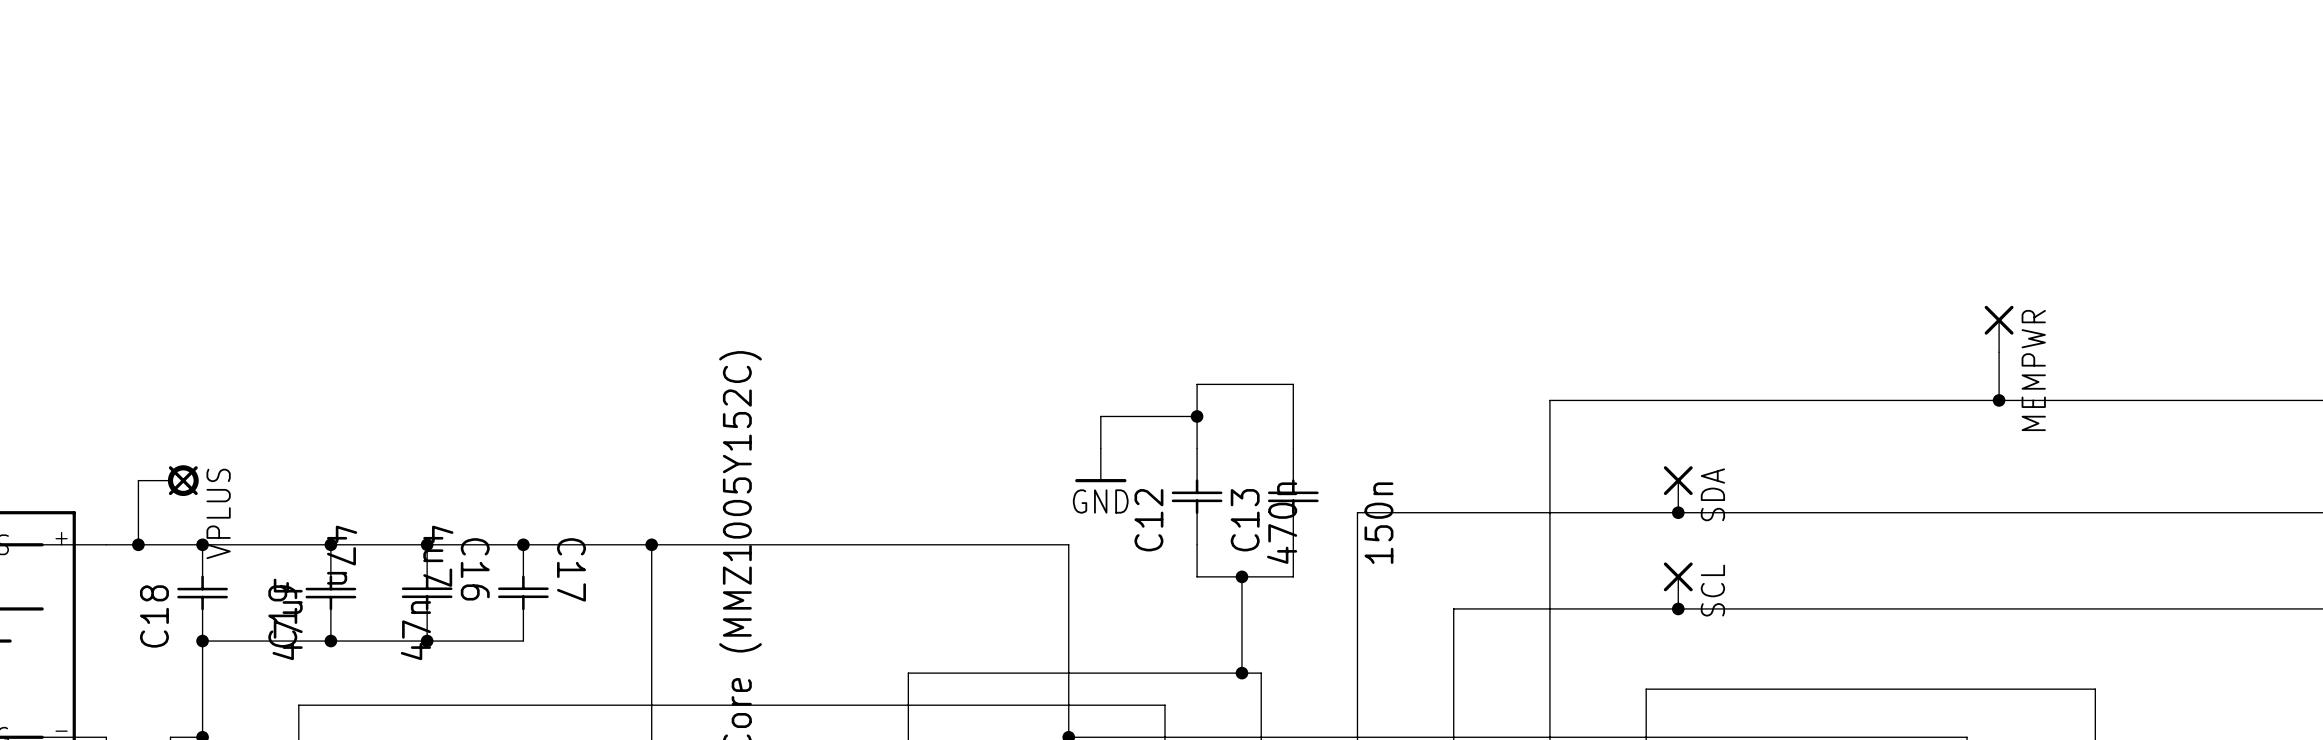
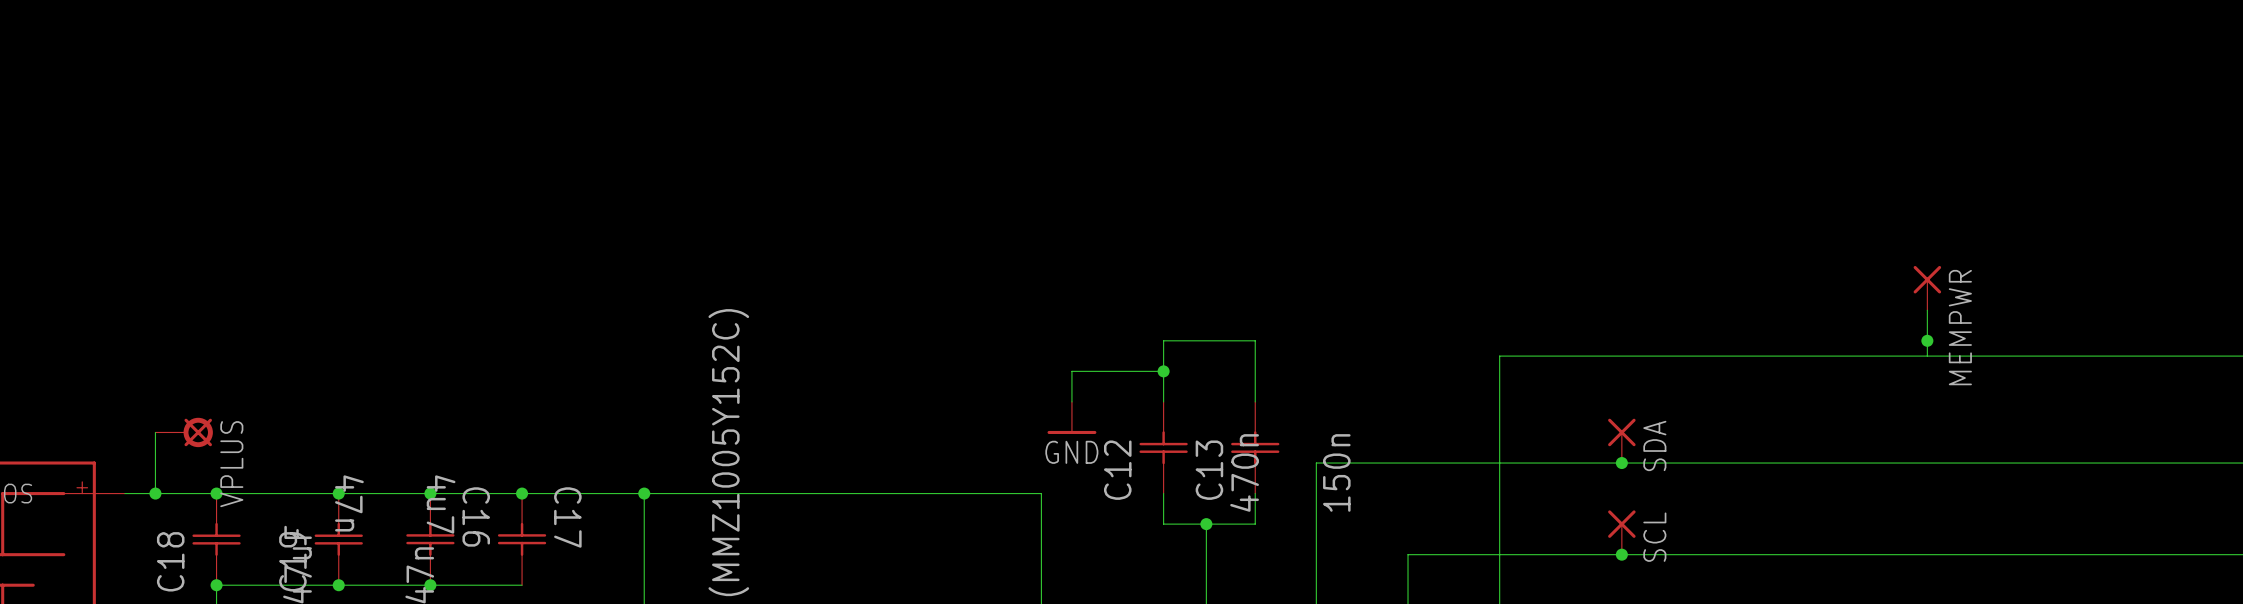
junction position: (1999, 400) -> (1927, 340)

